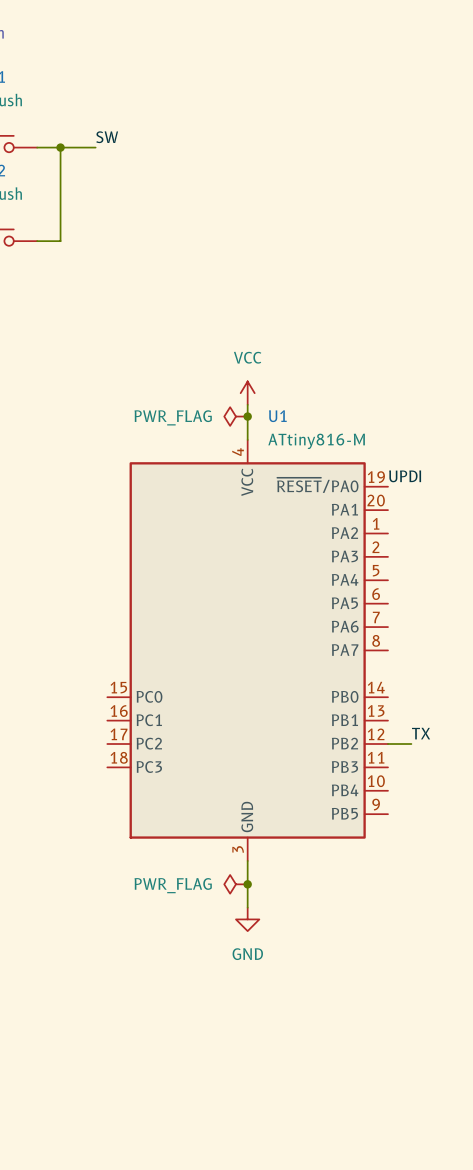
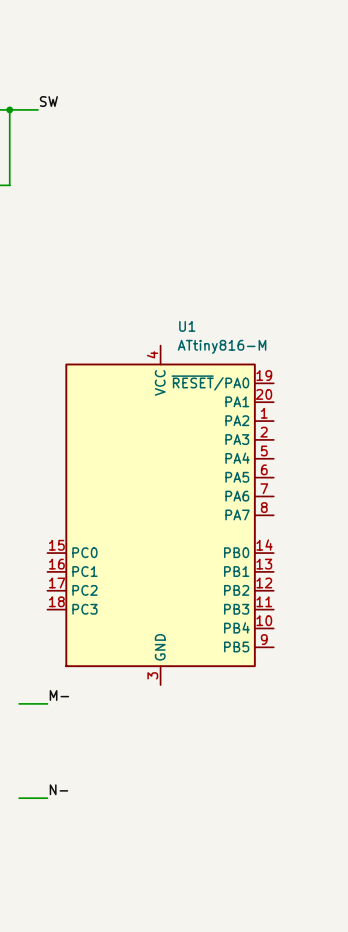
power symbol: VCC (247, 393) -> none
wire: (247, 404) (247, 439) -> none
power symbol: PWR_FLAG (235, 416) -> none
junction: (247, 416) -> none
label: UPDI (405, 476) -> none
label: TX (421, 733) -> none
wire: (388, 744) (411, 744) -> none
wire: (247, 860) (247, 907) -> none
label: none -> M- (59, 695)
wire: none -> (19, 703) (47, 703)
power symbol: PWR_FLAG (235, 884) -> none
junction: (247, 884) -> none
power symbol: GND (247, 919) -> none
label: none -> N- (58, 789)
wire: none -> (19, 798) (47, 798)

